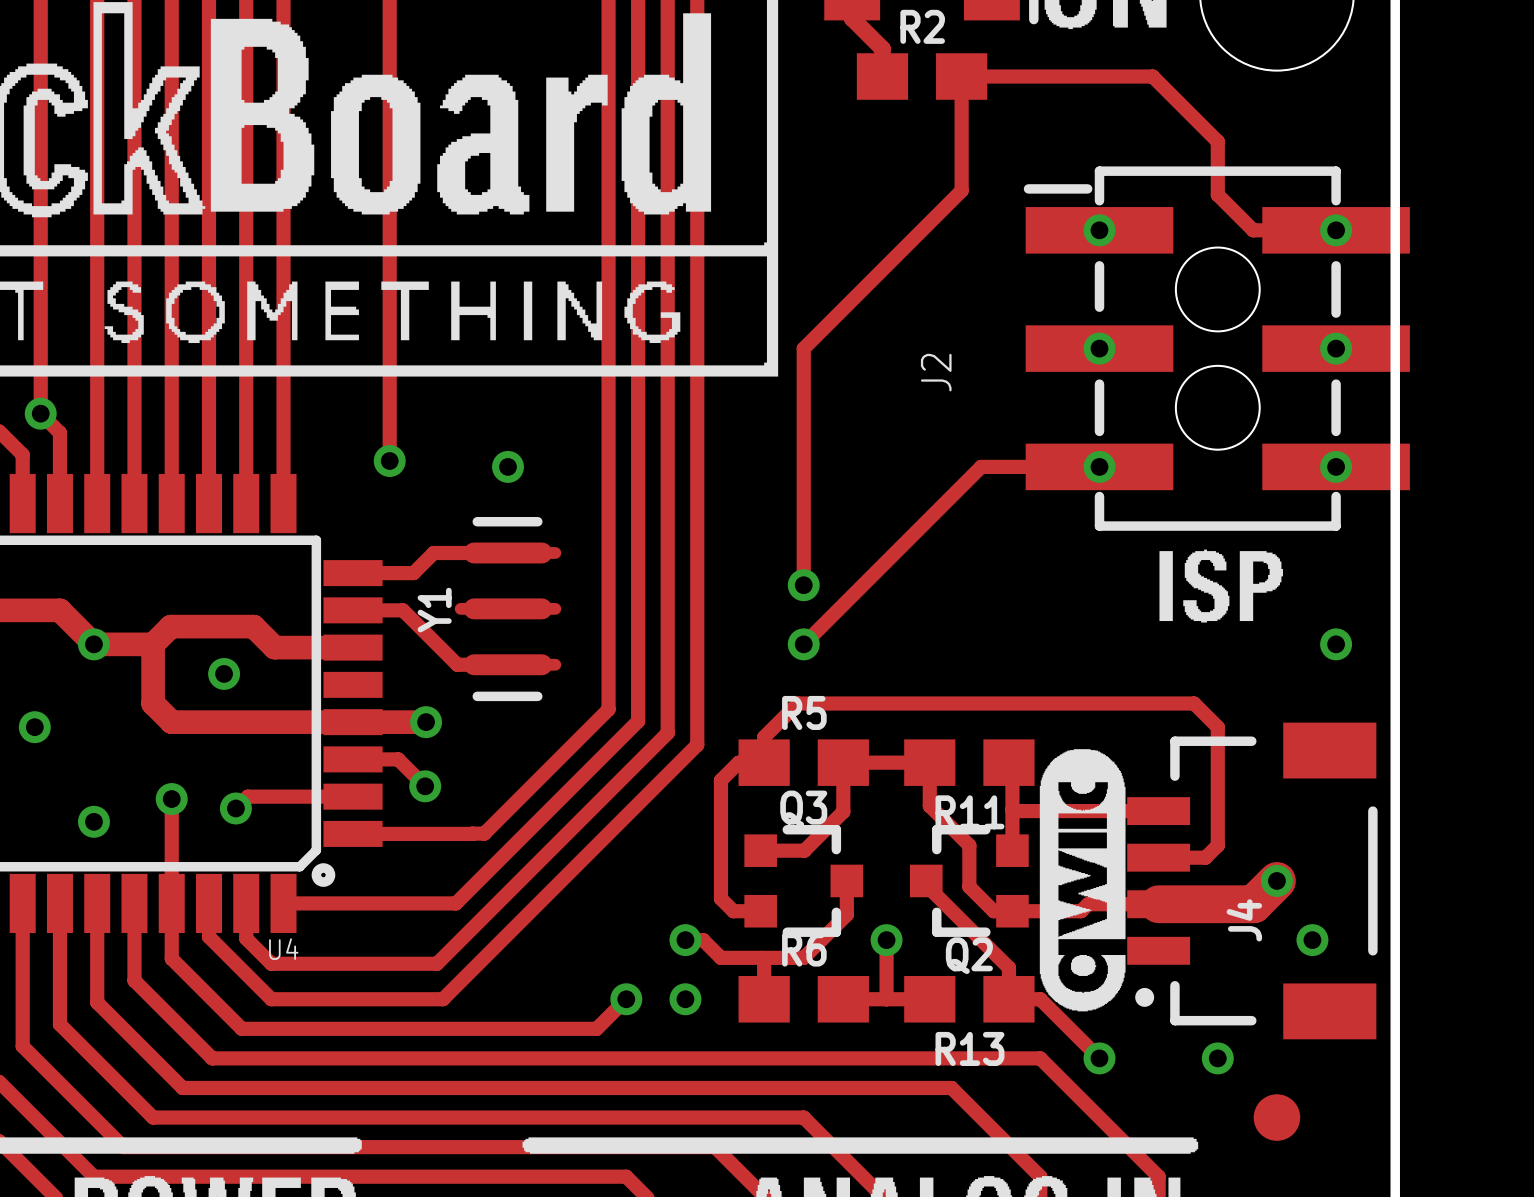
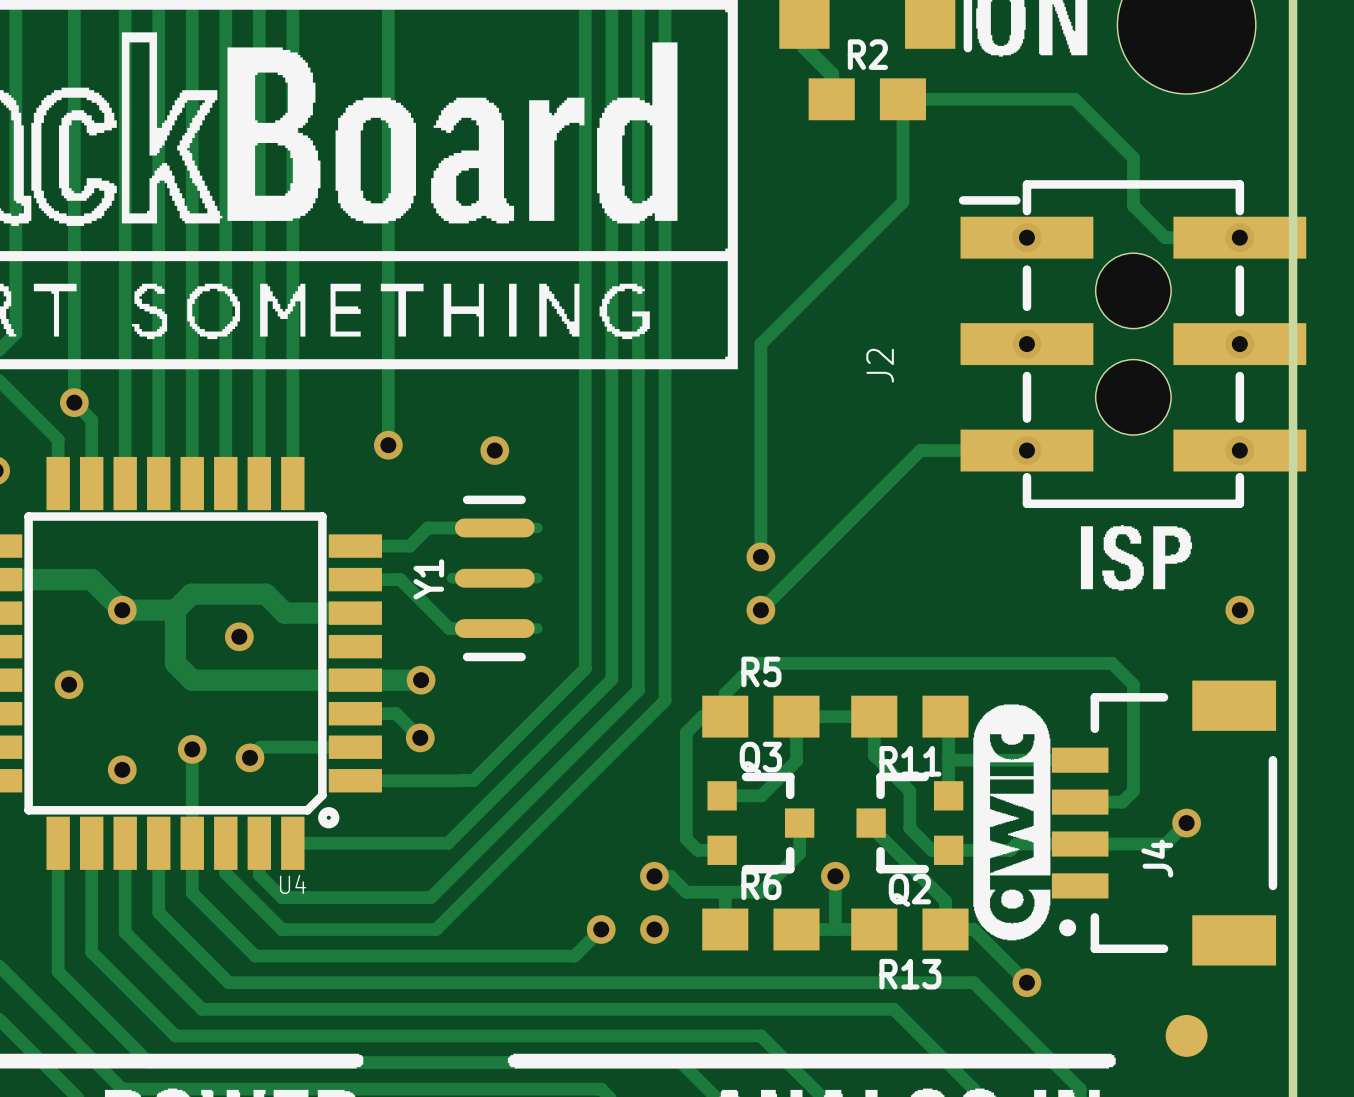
track width: thick (1276, 880) (1253, 904) (1158, 904) -> thin (1186, 823) (1165, 844) (1080, 844)
via: (1312, 940) -> none
via: (1217, 1058) -> none

